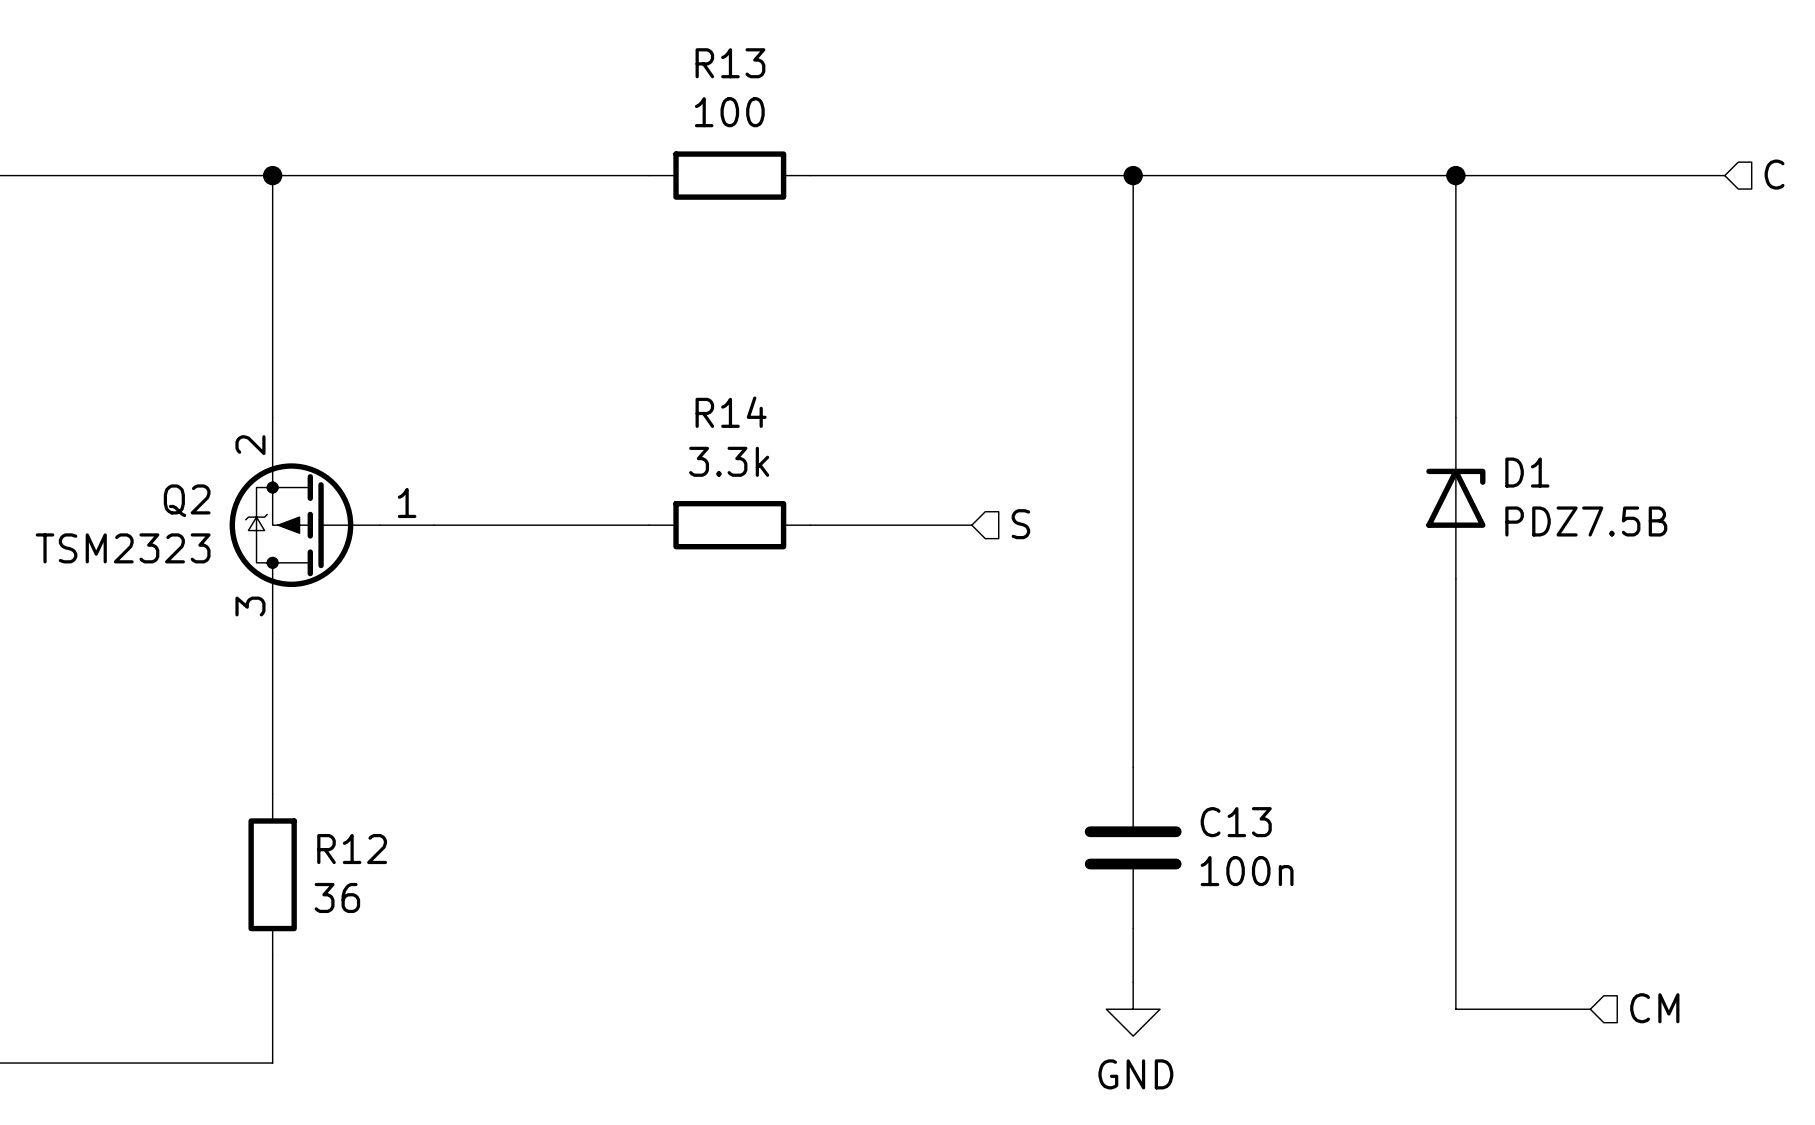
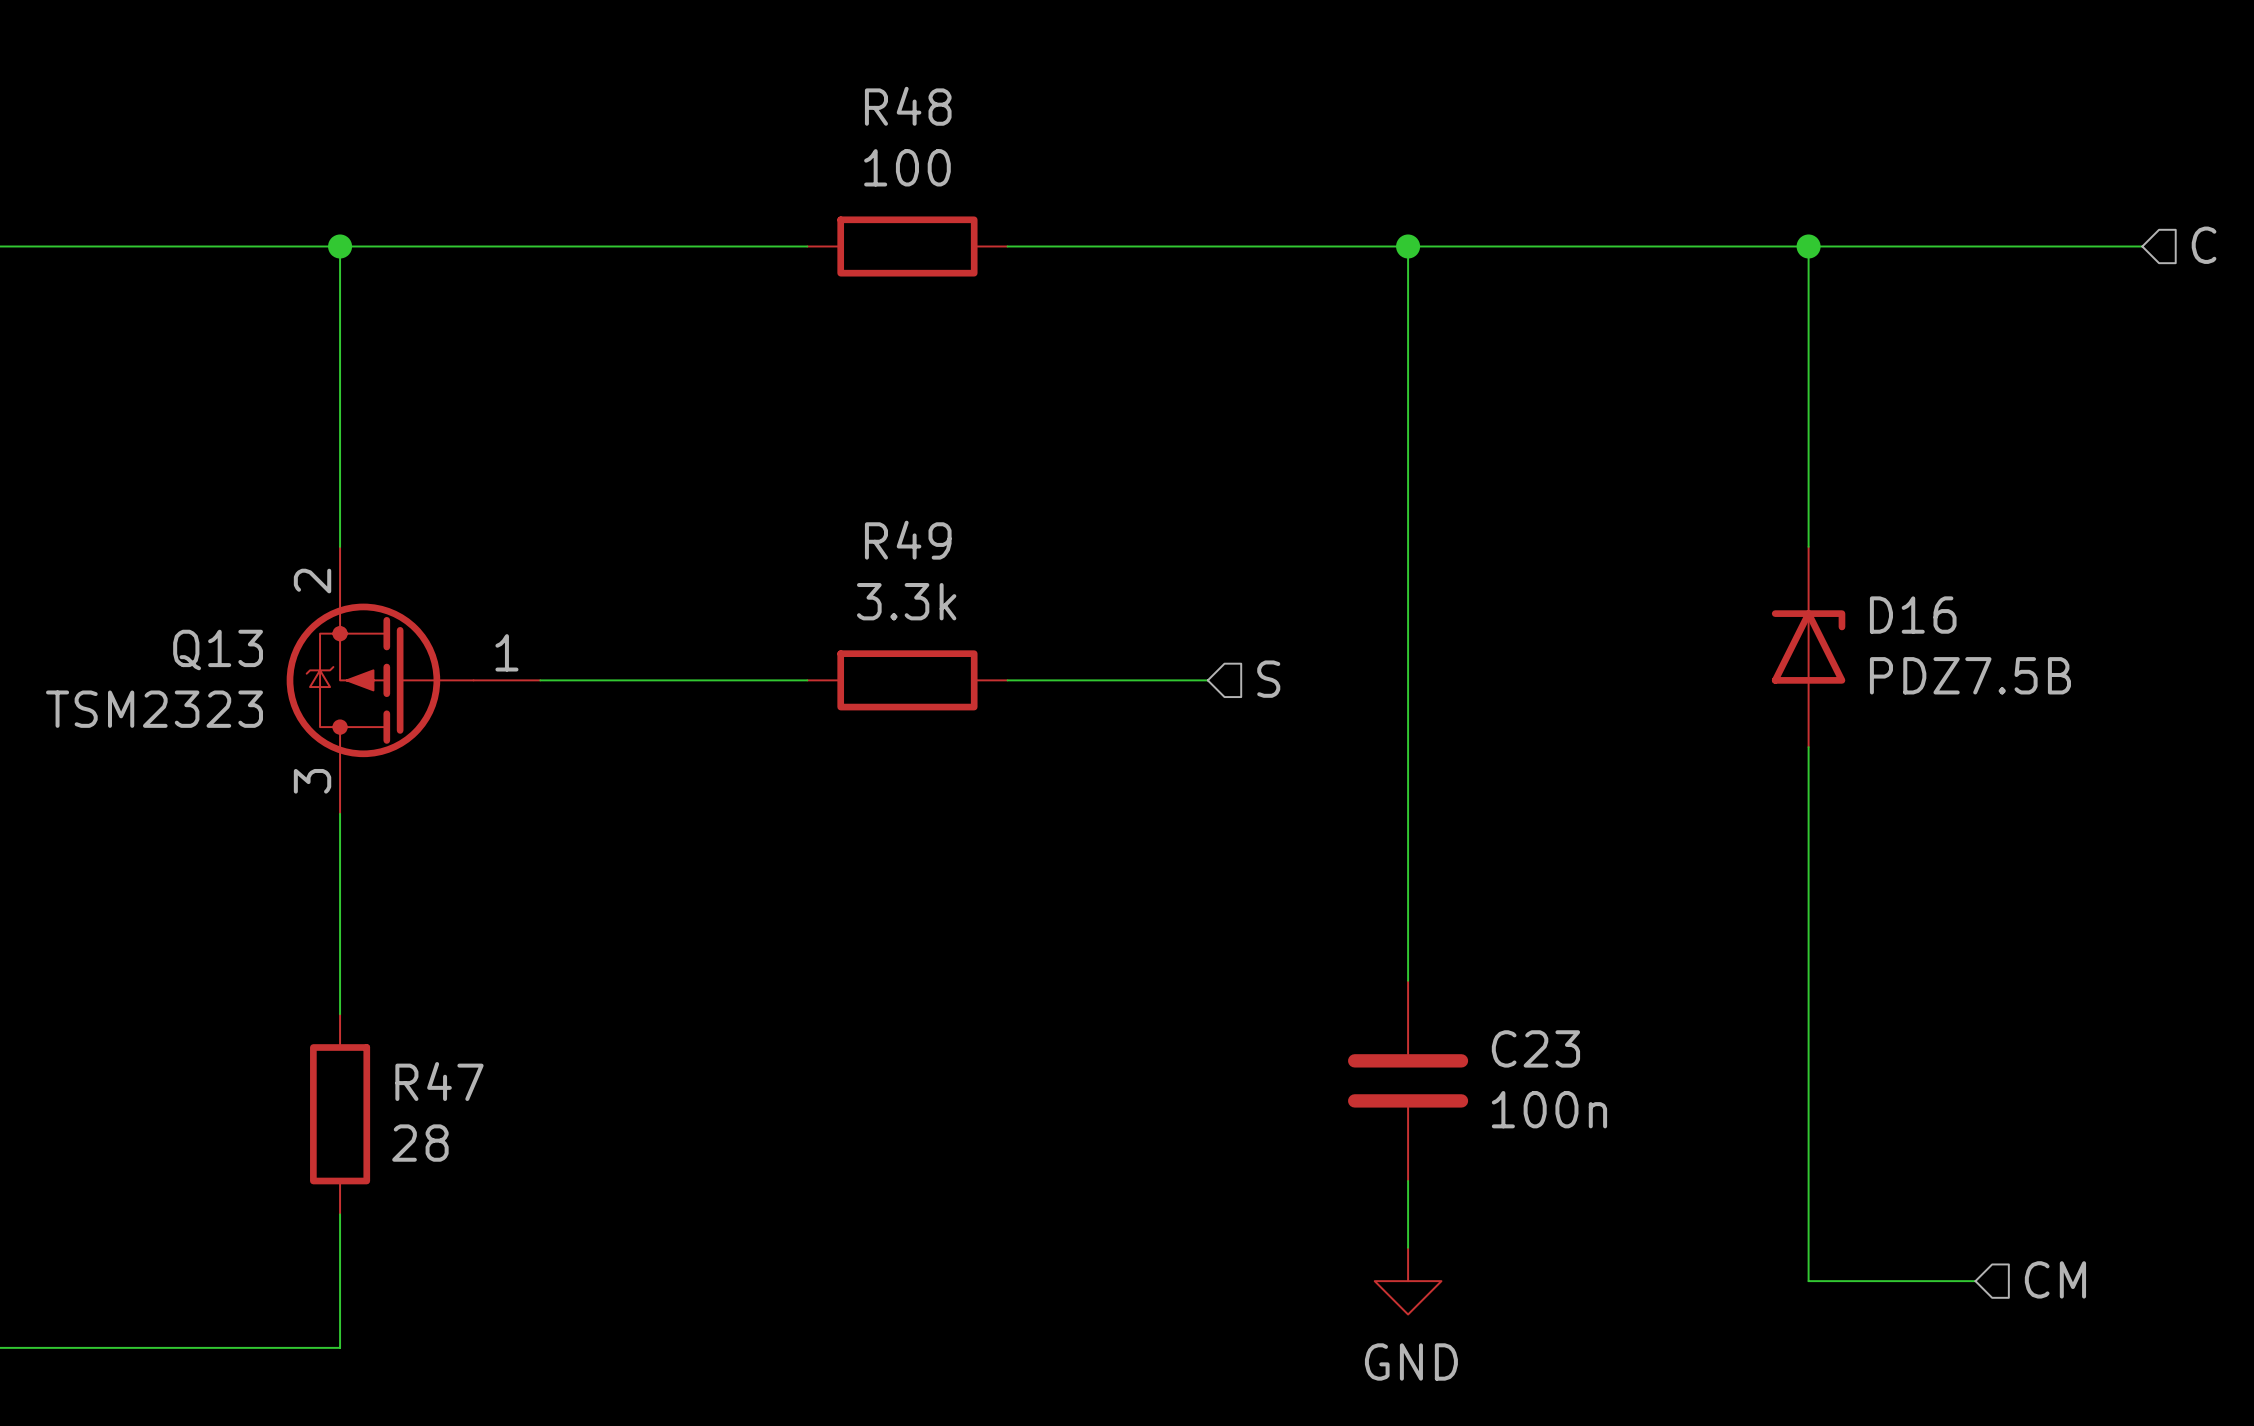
R13 name: R13 (730, 63) -> R48 (908, 106)
R14 name: R14 (731, 412) -> R49 (908, 540)
D1 name: D1 (1527, 472) -> D16 (1913, 615)
Q2 name: Q2 (187, 500) -> Q13 (218, 650)
C13 name: C13 (1236, 822) -> C23 (1535, 1048)
R12 name: R12 (352, 849) -> R47 (439, 1081)
R12 value: 36 (337, 897) -> 28 (420, 1143)

